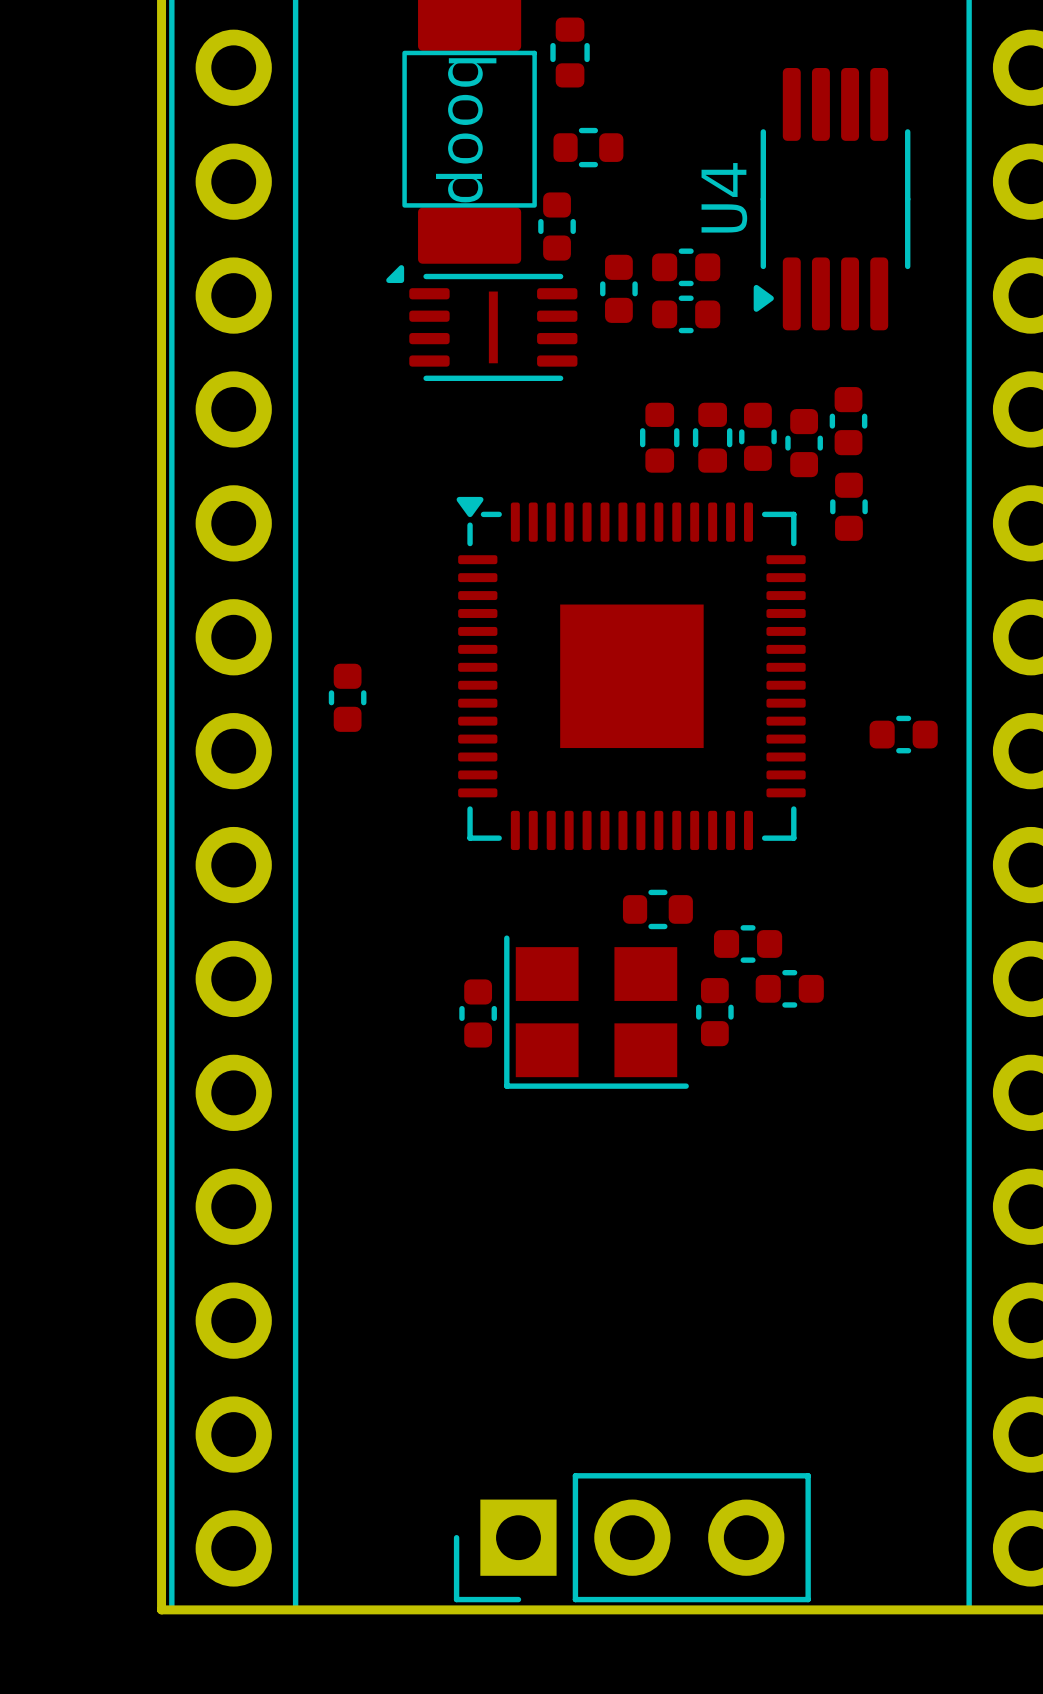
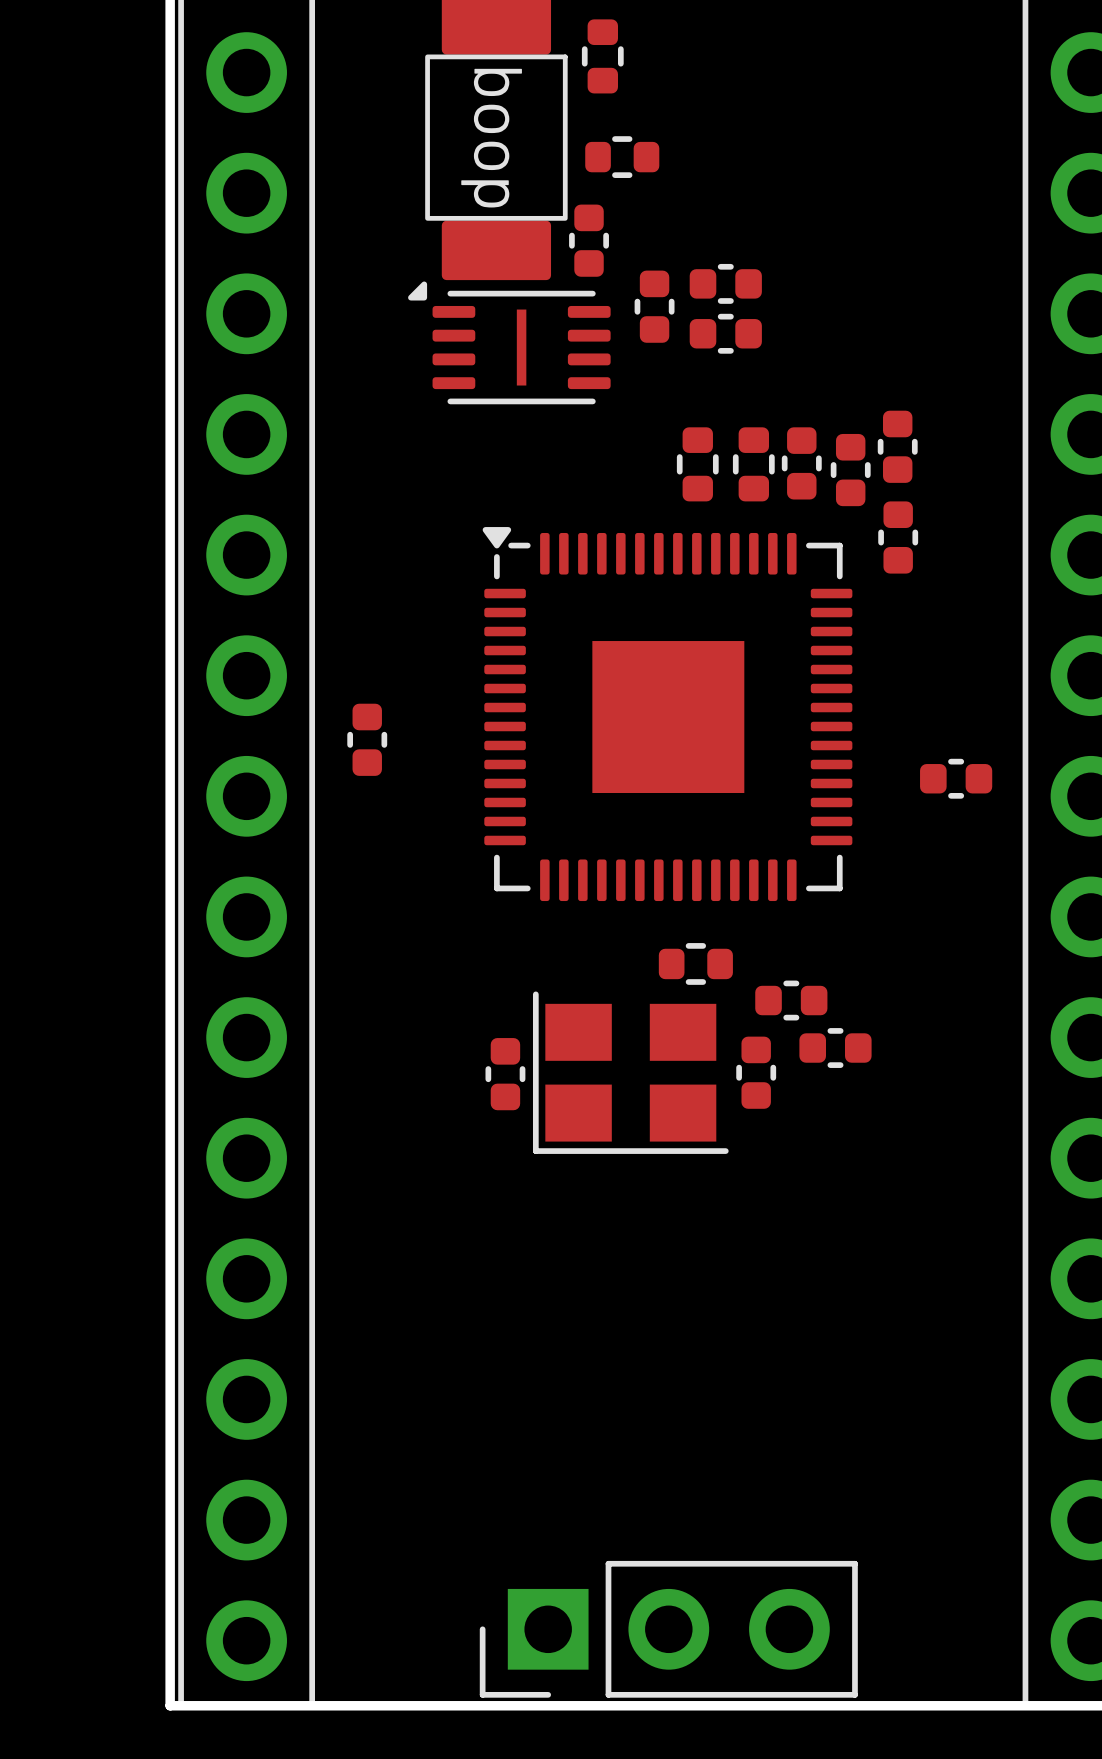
U4: (832, 199) -> none

